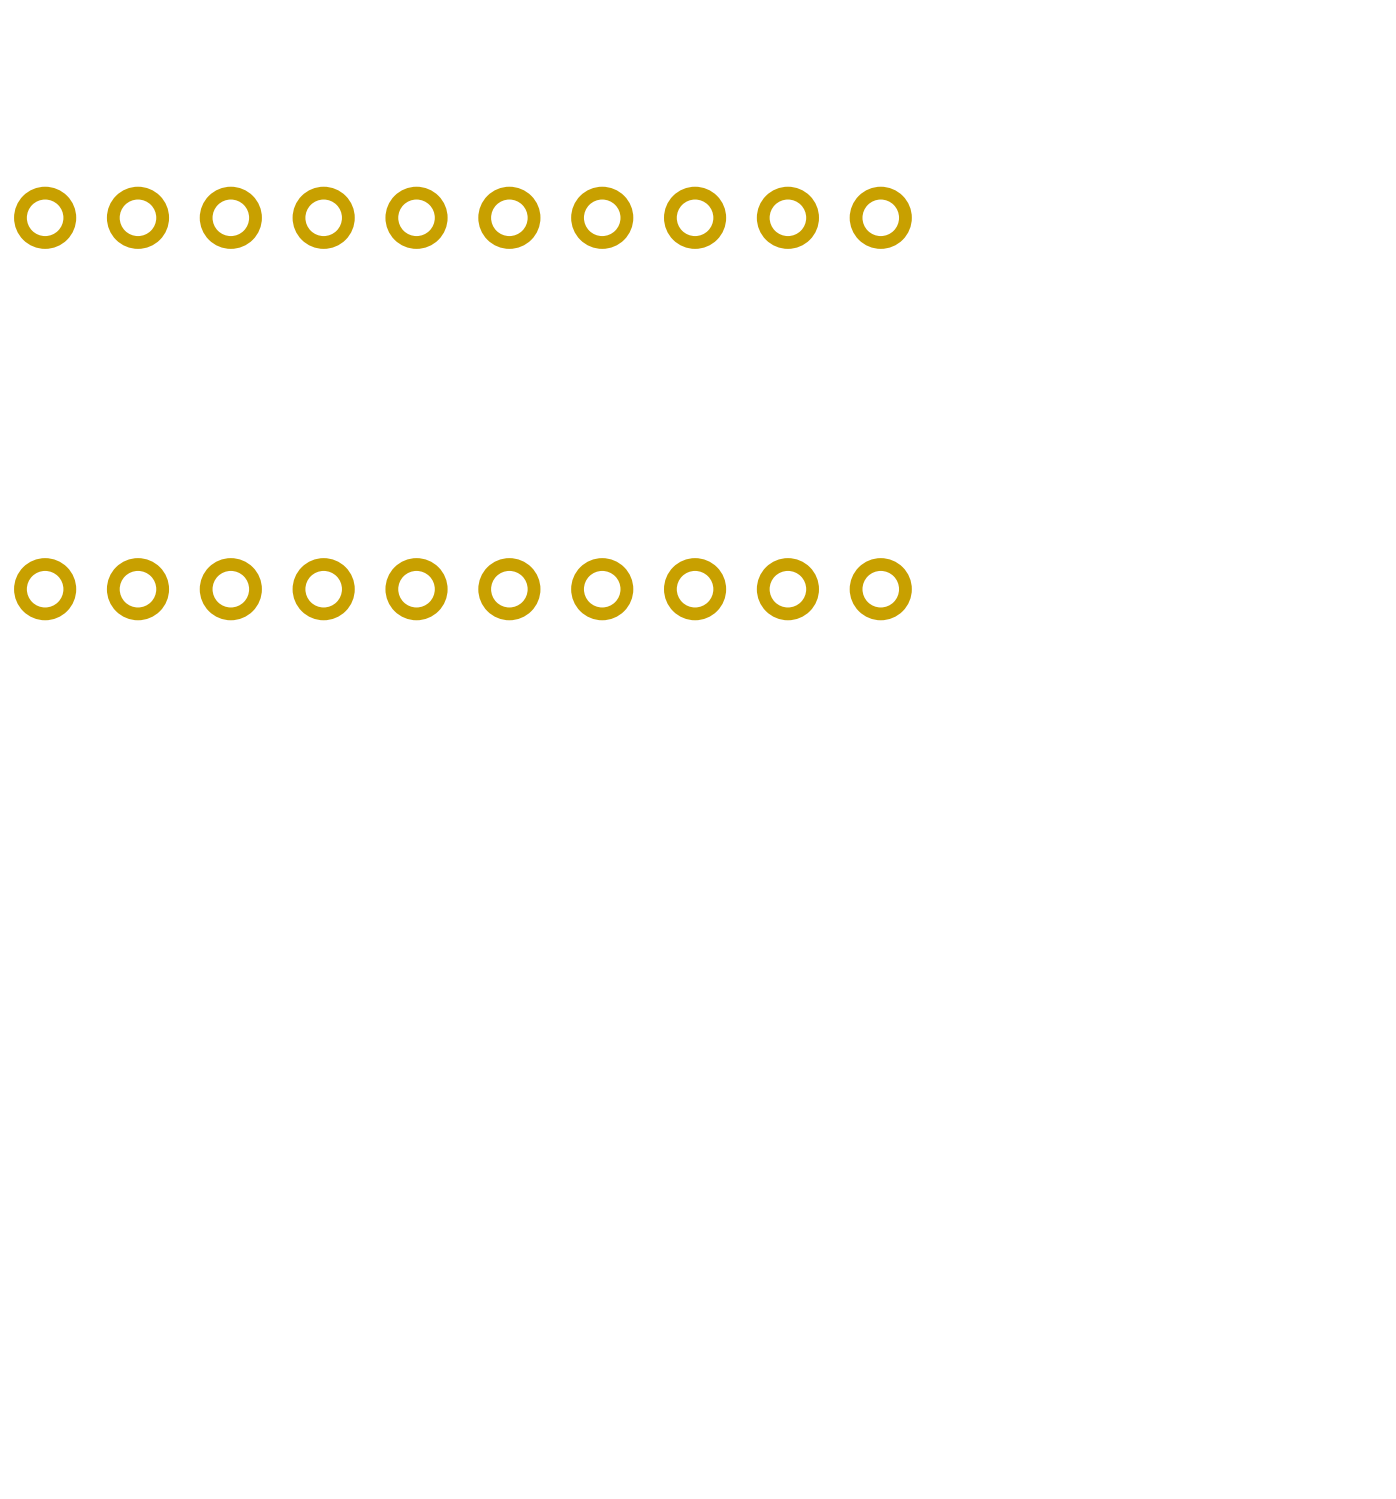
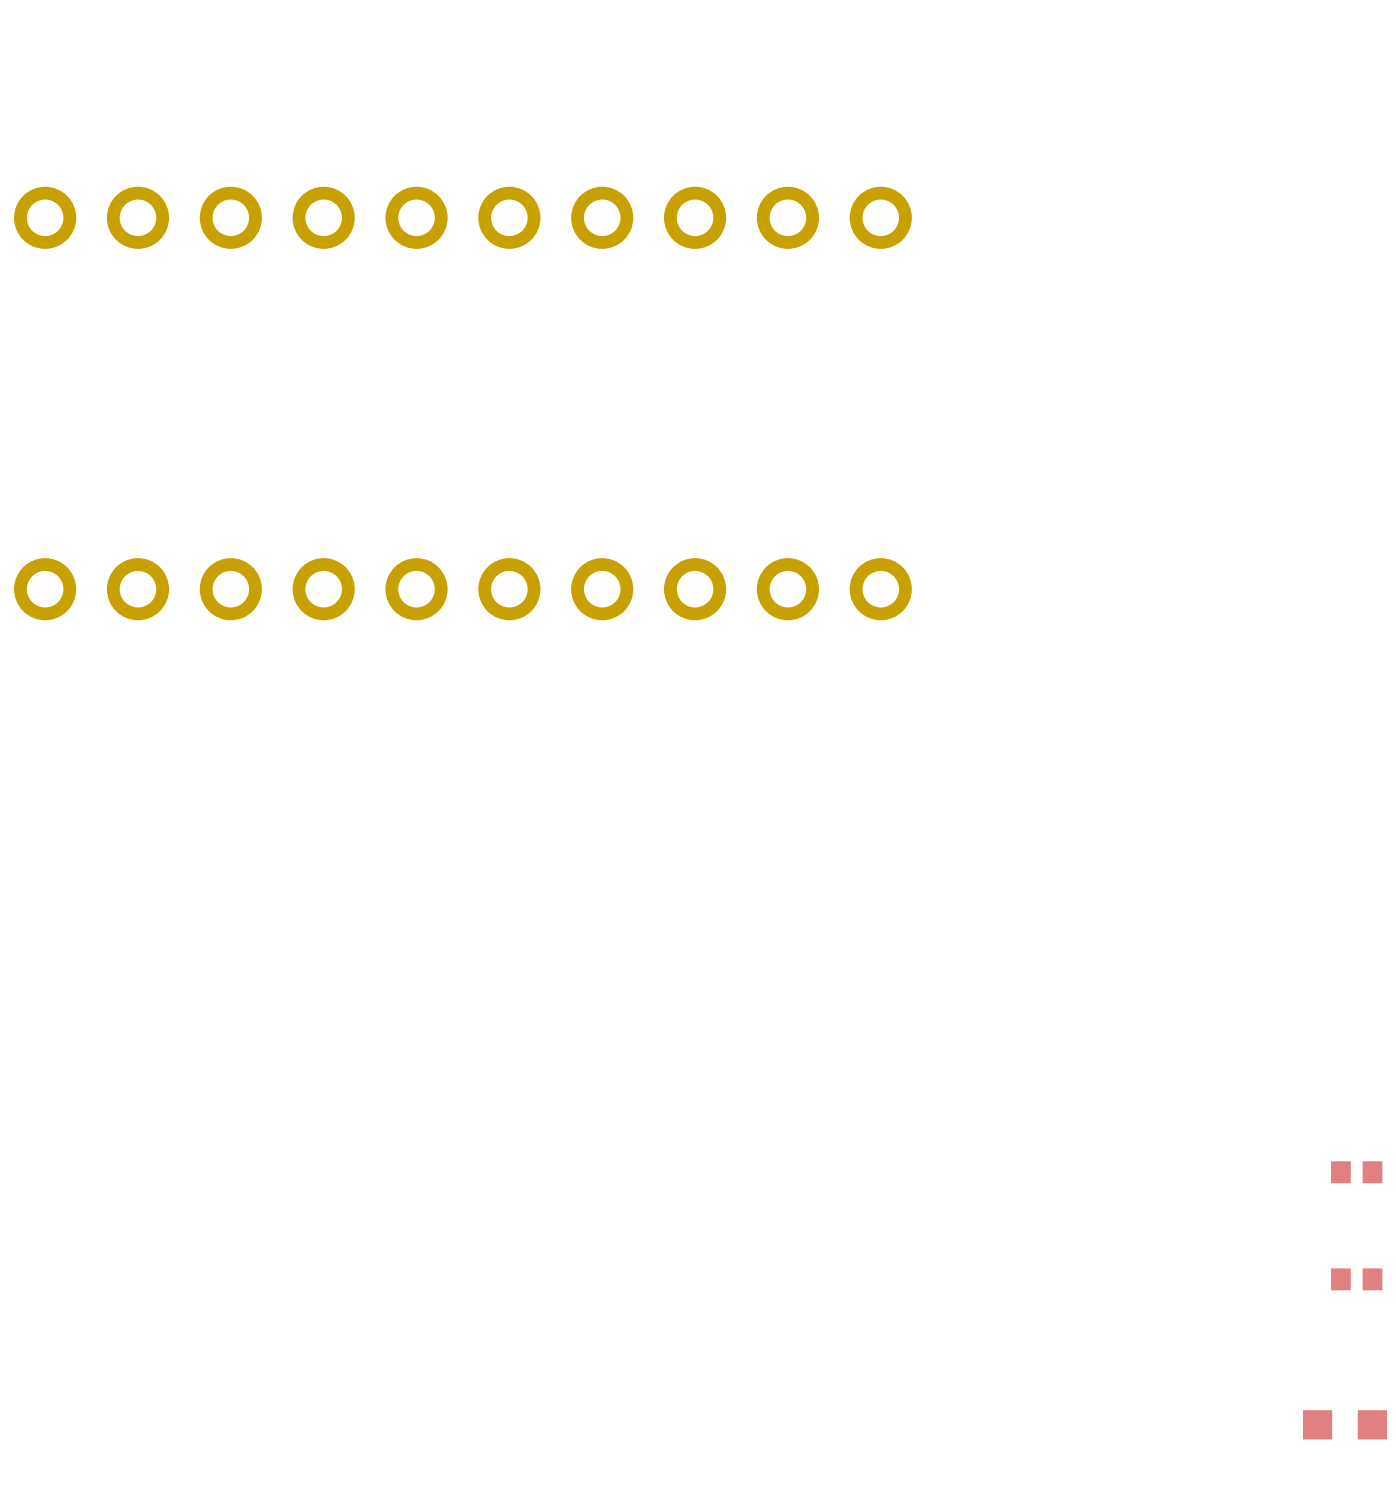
part: none -> (1356, 1172)
part: none -> (1356, 1279)
part: none -> (1345, 1424)

